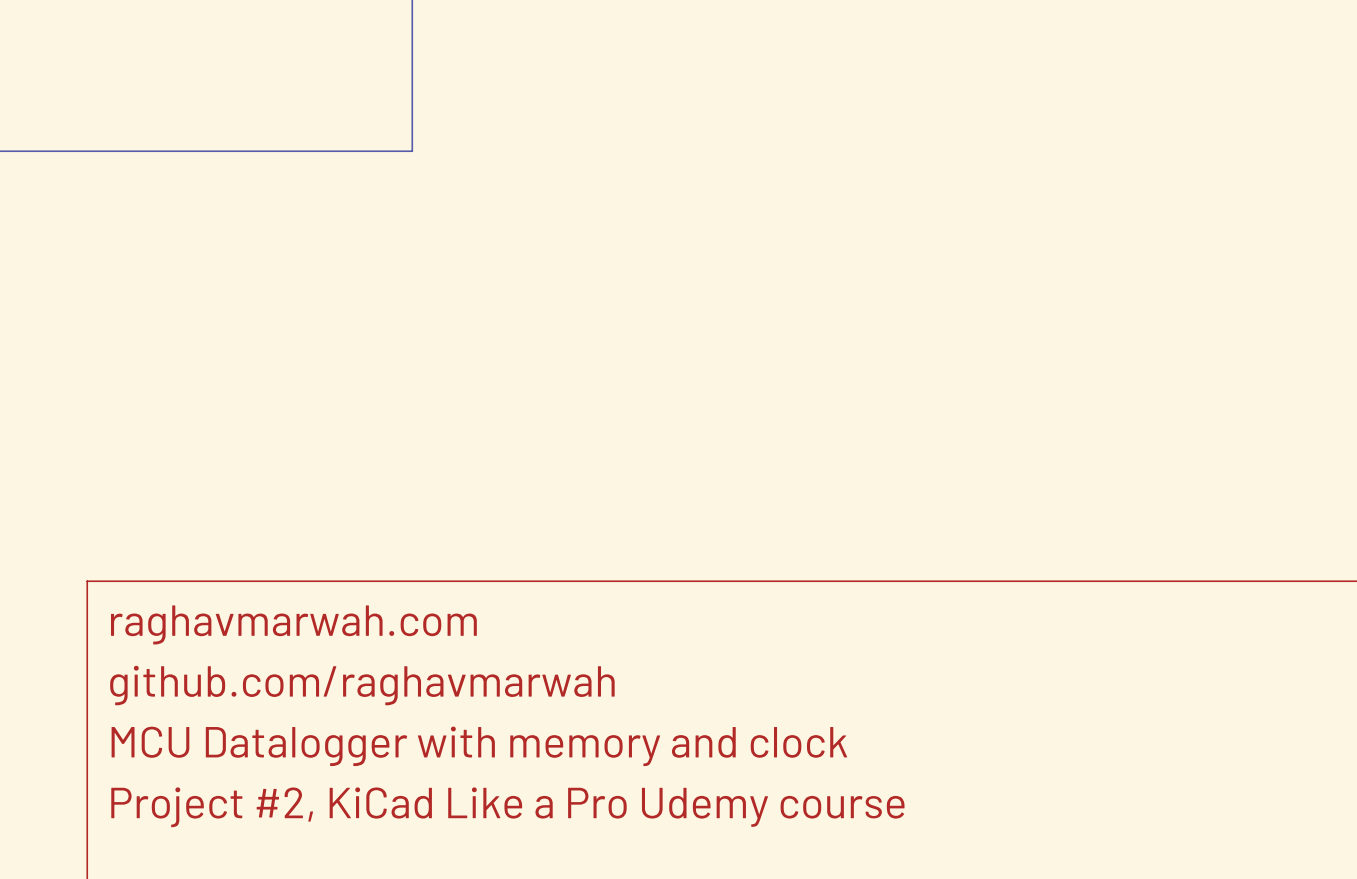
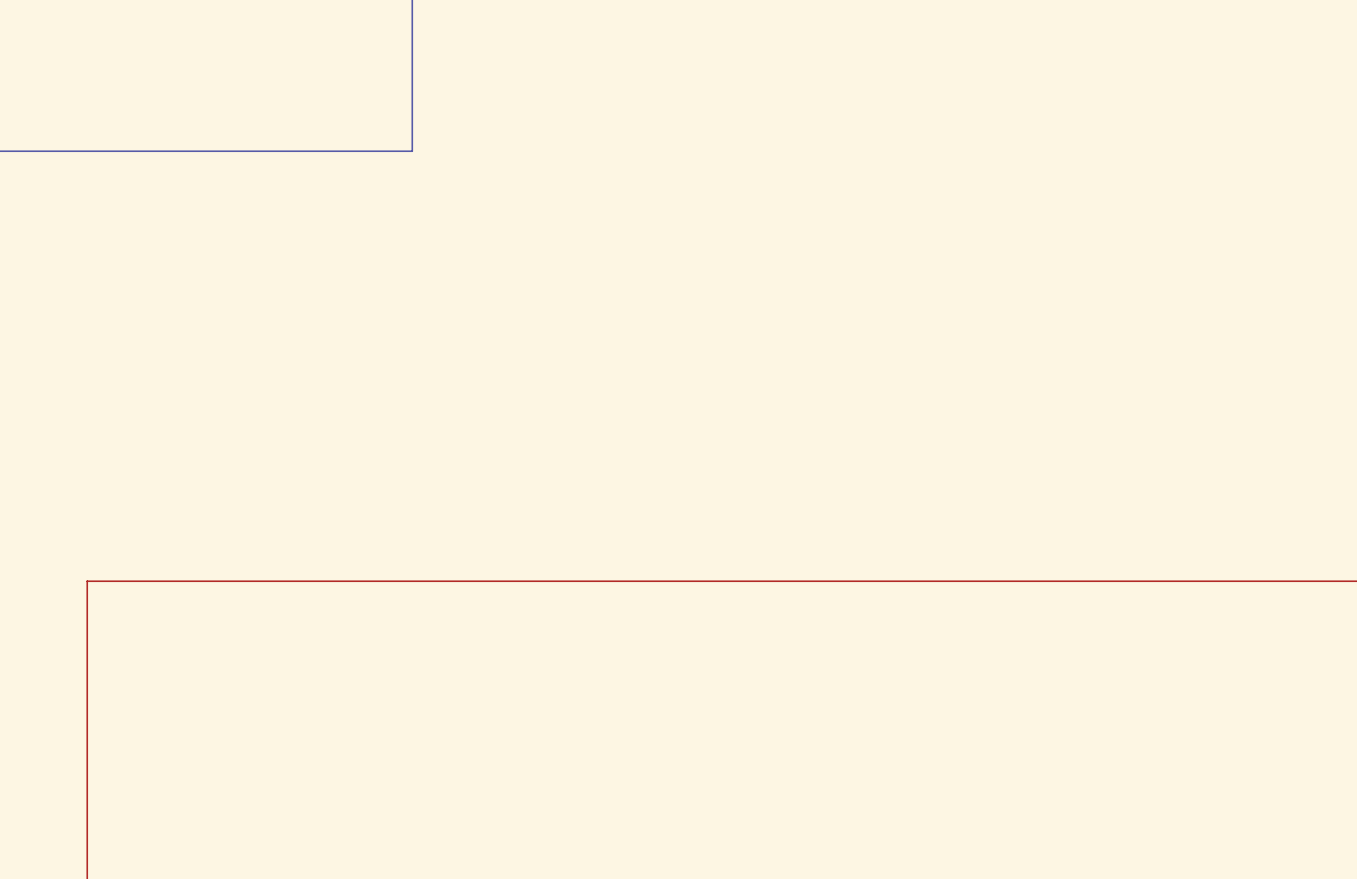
title block: raghavmarwah.com (293, 624) -> none
title block: github.com/raghavmarwah (362, 685) -> none
title block: MCU Datalogger with memory and clock (479, 746) -> none
title block: Project #2, KiCad Like a Pro Udemy course (507, 807) -> none

